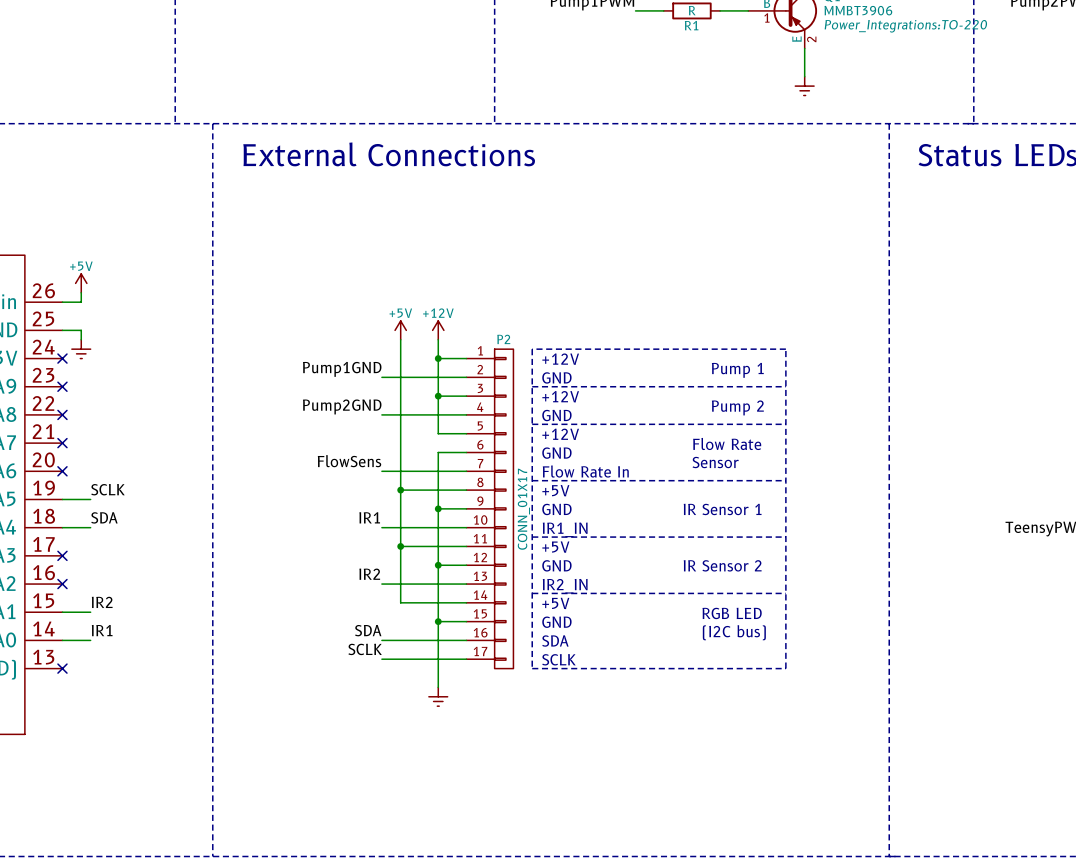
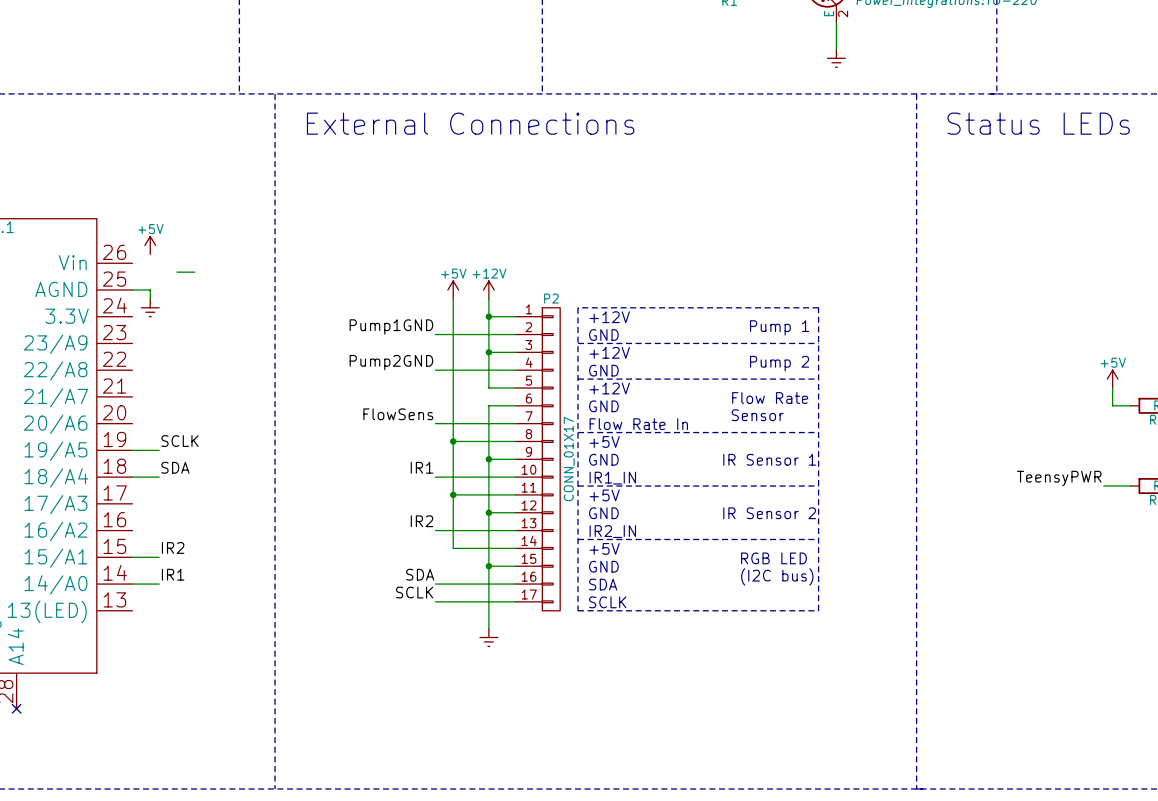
wire: (81, 292) (81, 302) (62, 302) -> none
wire: none -> (177, 272) (194, 272)
no-connect mark: (62, 358) -> none
no-connect mark: (62, 386) -> none
no-connect mark: (62, 414) -> none
no-connect mark: (62, 443) -> none
no-connect mark: (62, 471) -> none
no-connect mark: (62, 555) -> none
no-connect mark: (62, 584) -> none
no-connect mark: (62, 668) -> none

